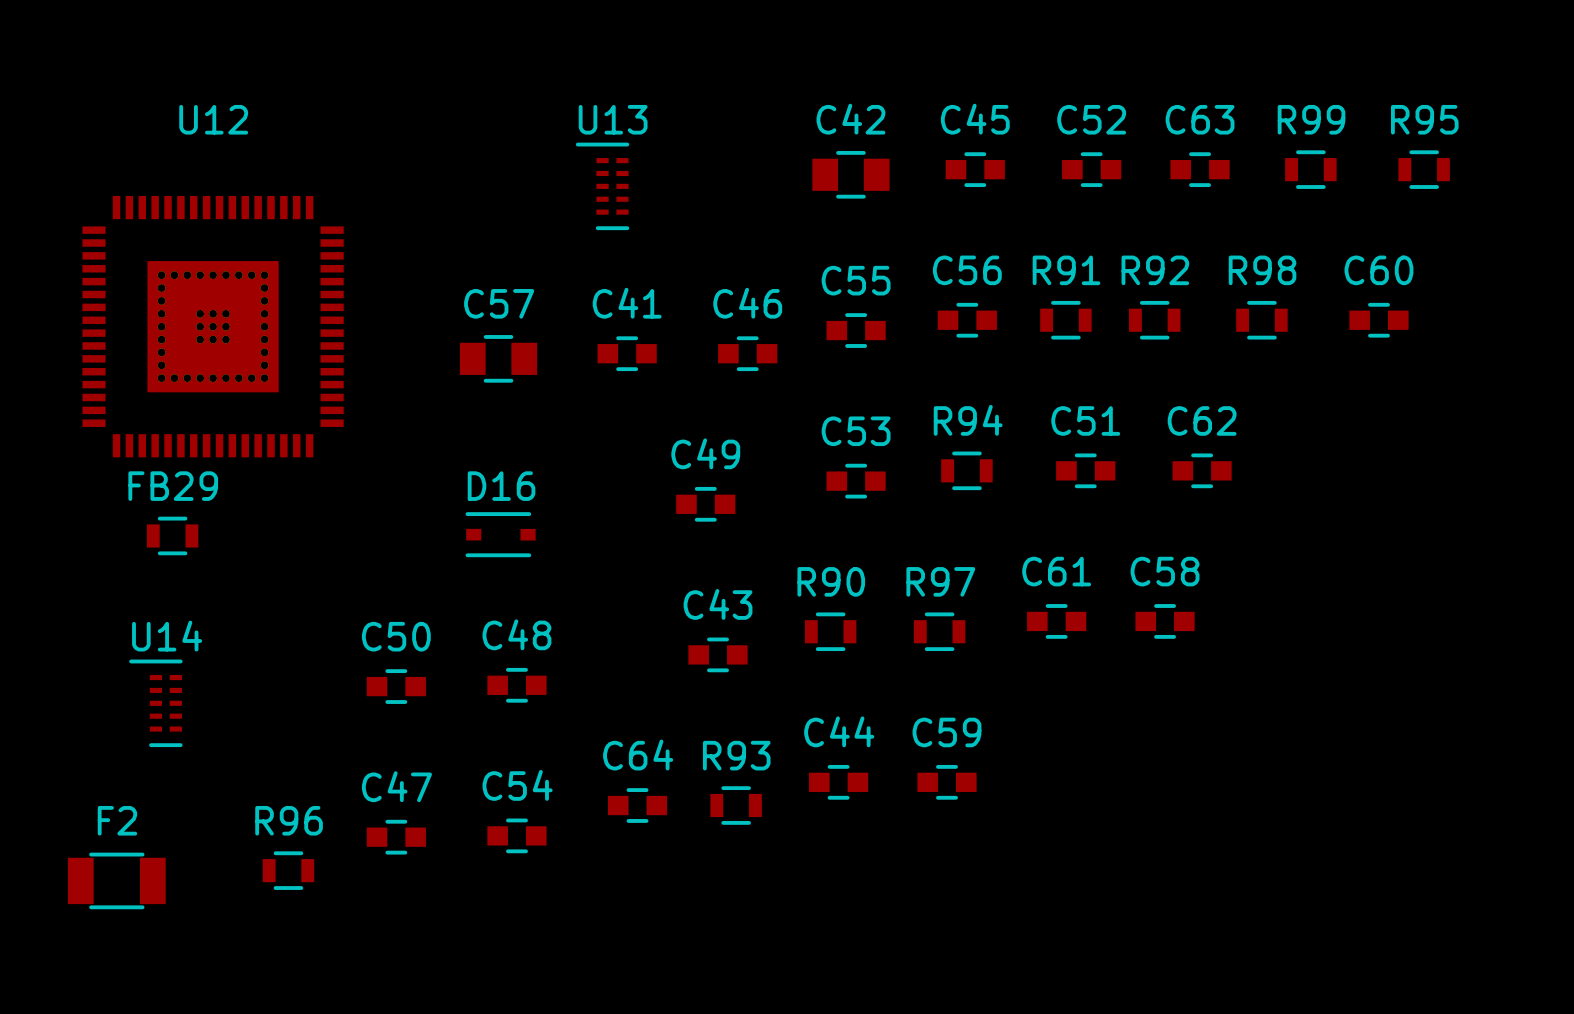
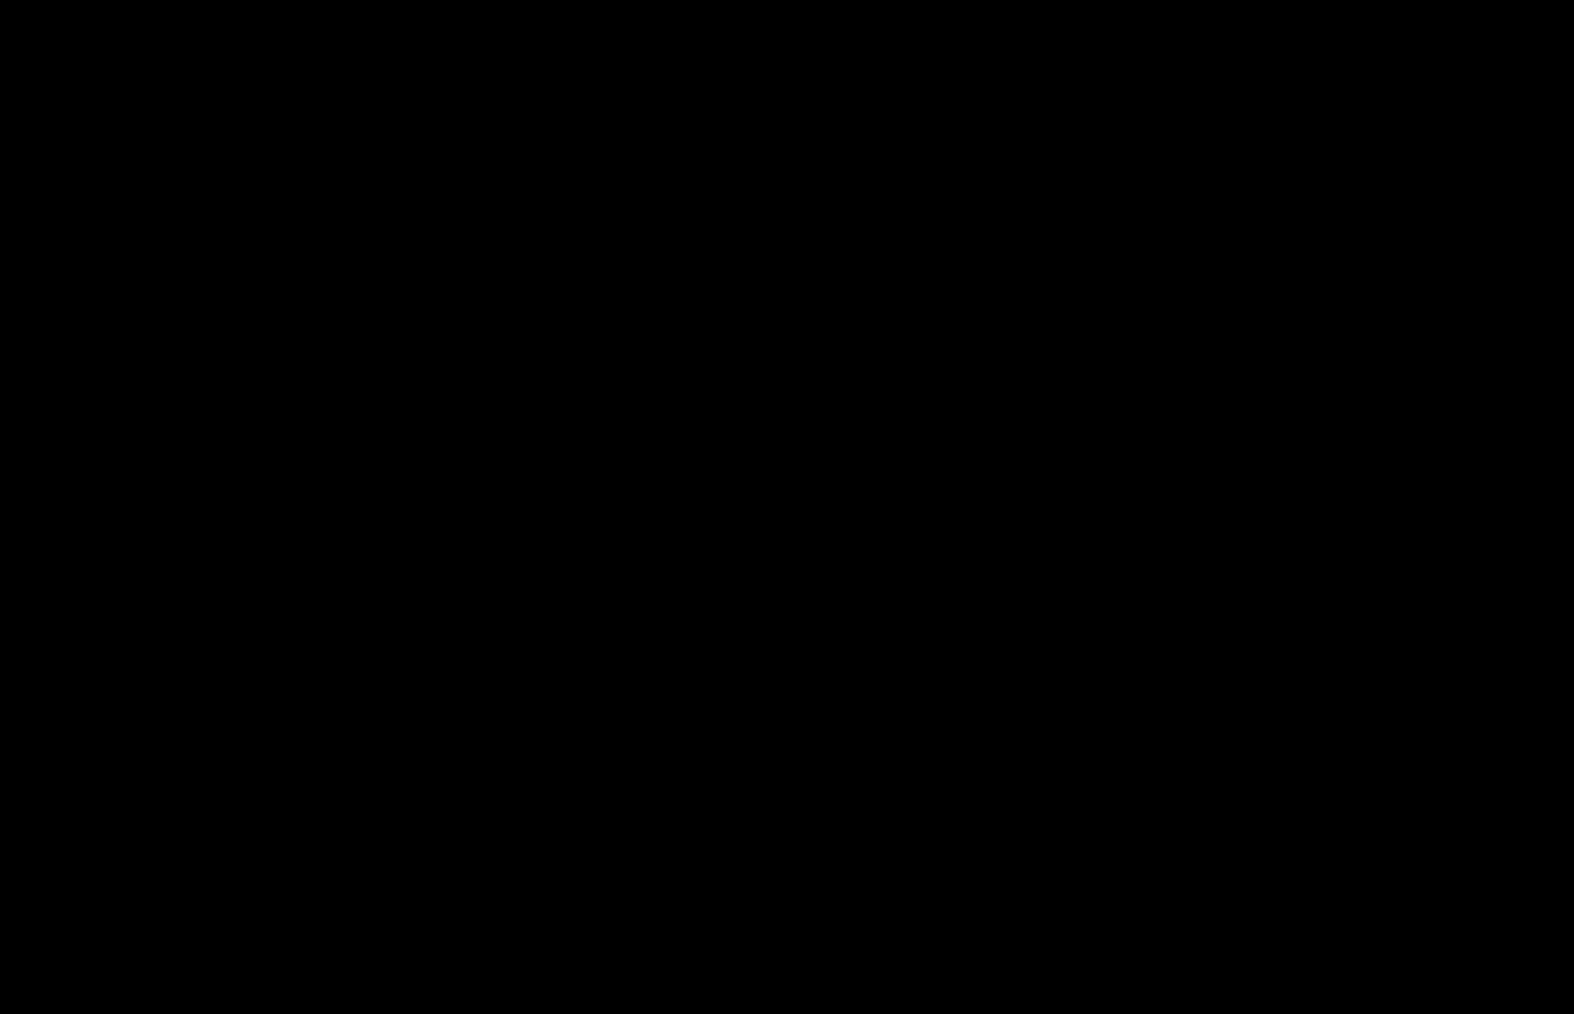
C45: (975, 169) -> none
C52: (1091, 169) -> none
C63: (1200, 169) -> none
R99: (1310, 169) -> none
R95: (1424, 169) -> none
C42: (850, 174) -> none
U13: (602, 186) -> none
C56: (967, 320) -> none
R91: (1065, 320) -> none
R92: (1154, 320) -> none
R98: (1261, 320) -> none
C60: (1378, 320) -> none
U12: (213, 326) -> none
C55: (856, 330) -> none
C41: (627, 353) -> none
C46: (747, 353) -> none
C57: (498, 358) -> none
R94: (966, 470) -> none
C51: (1085, 470) -> none
C62: (1202, 470) -> none
C53: (856, 481) -> none
C49: (705, 504) -> none
D16: (500, 534) -> none
FB29: (172, 535) -> none
C61: (1056, 621) -> none
C58: (1165, 621) -> none
R90: (830, 631) -> none
R97: (939, 631) -> none
C43: (718, 654) -> none
C48: (516, 685) -> none
C50: (396, 686) -> none
U14: (155, 703) -> none
C44: (838, 782) -> none
C59: (946, 782) -> none
C64: (637, 805) -> none
R93: (736, 805) -> none
C54: (516, 835) -> none
C47: (396, 837) -> none
R96: (288, 870) -> none
F2: (116, 880) -> none

